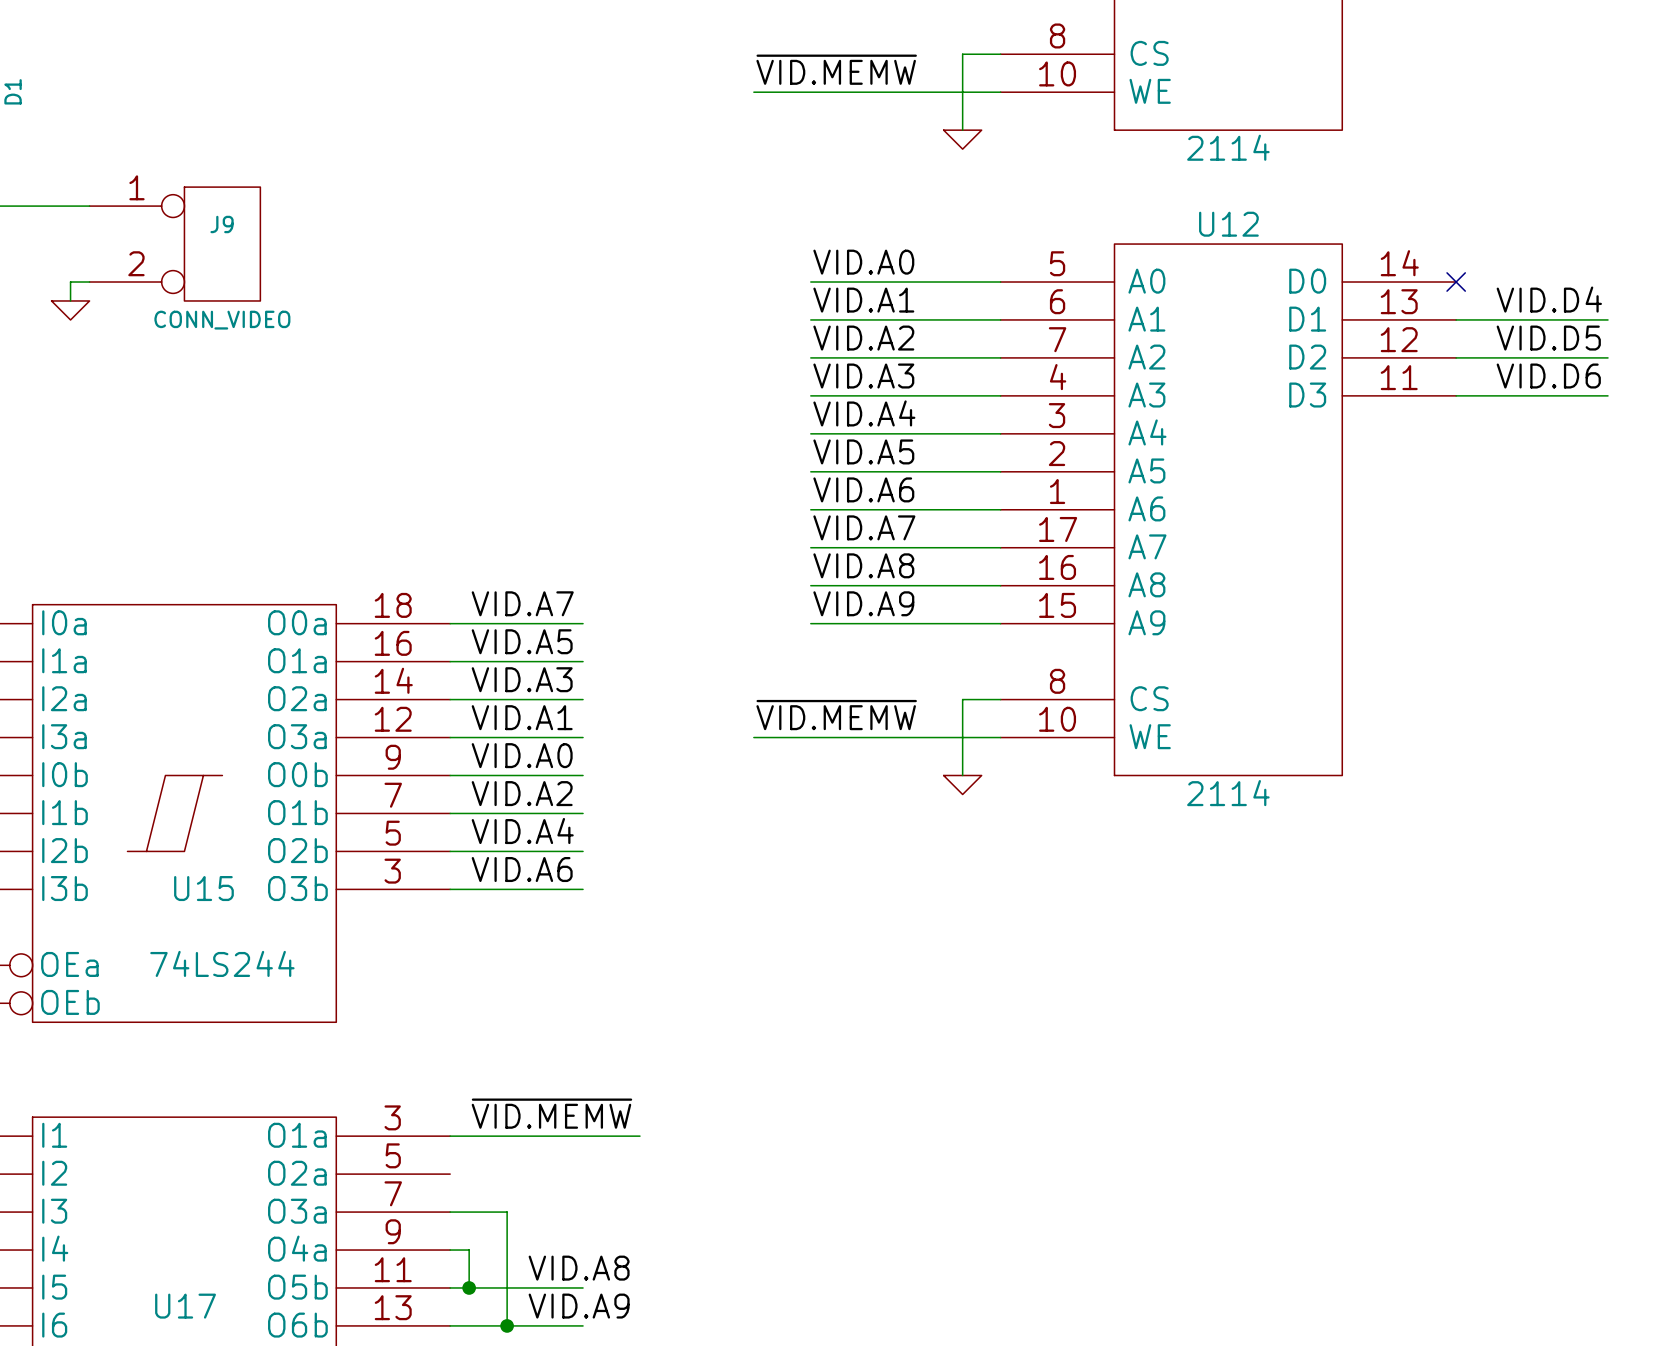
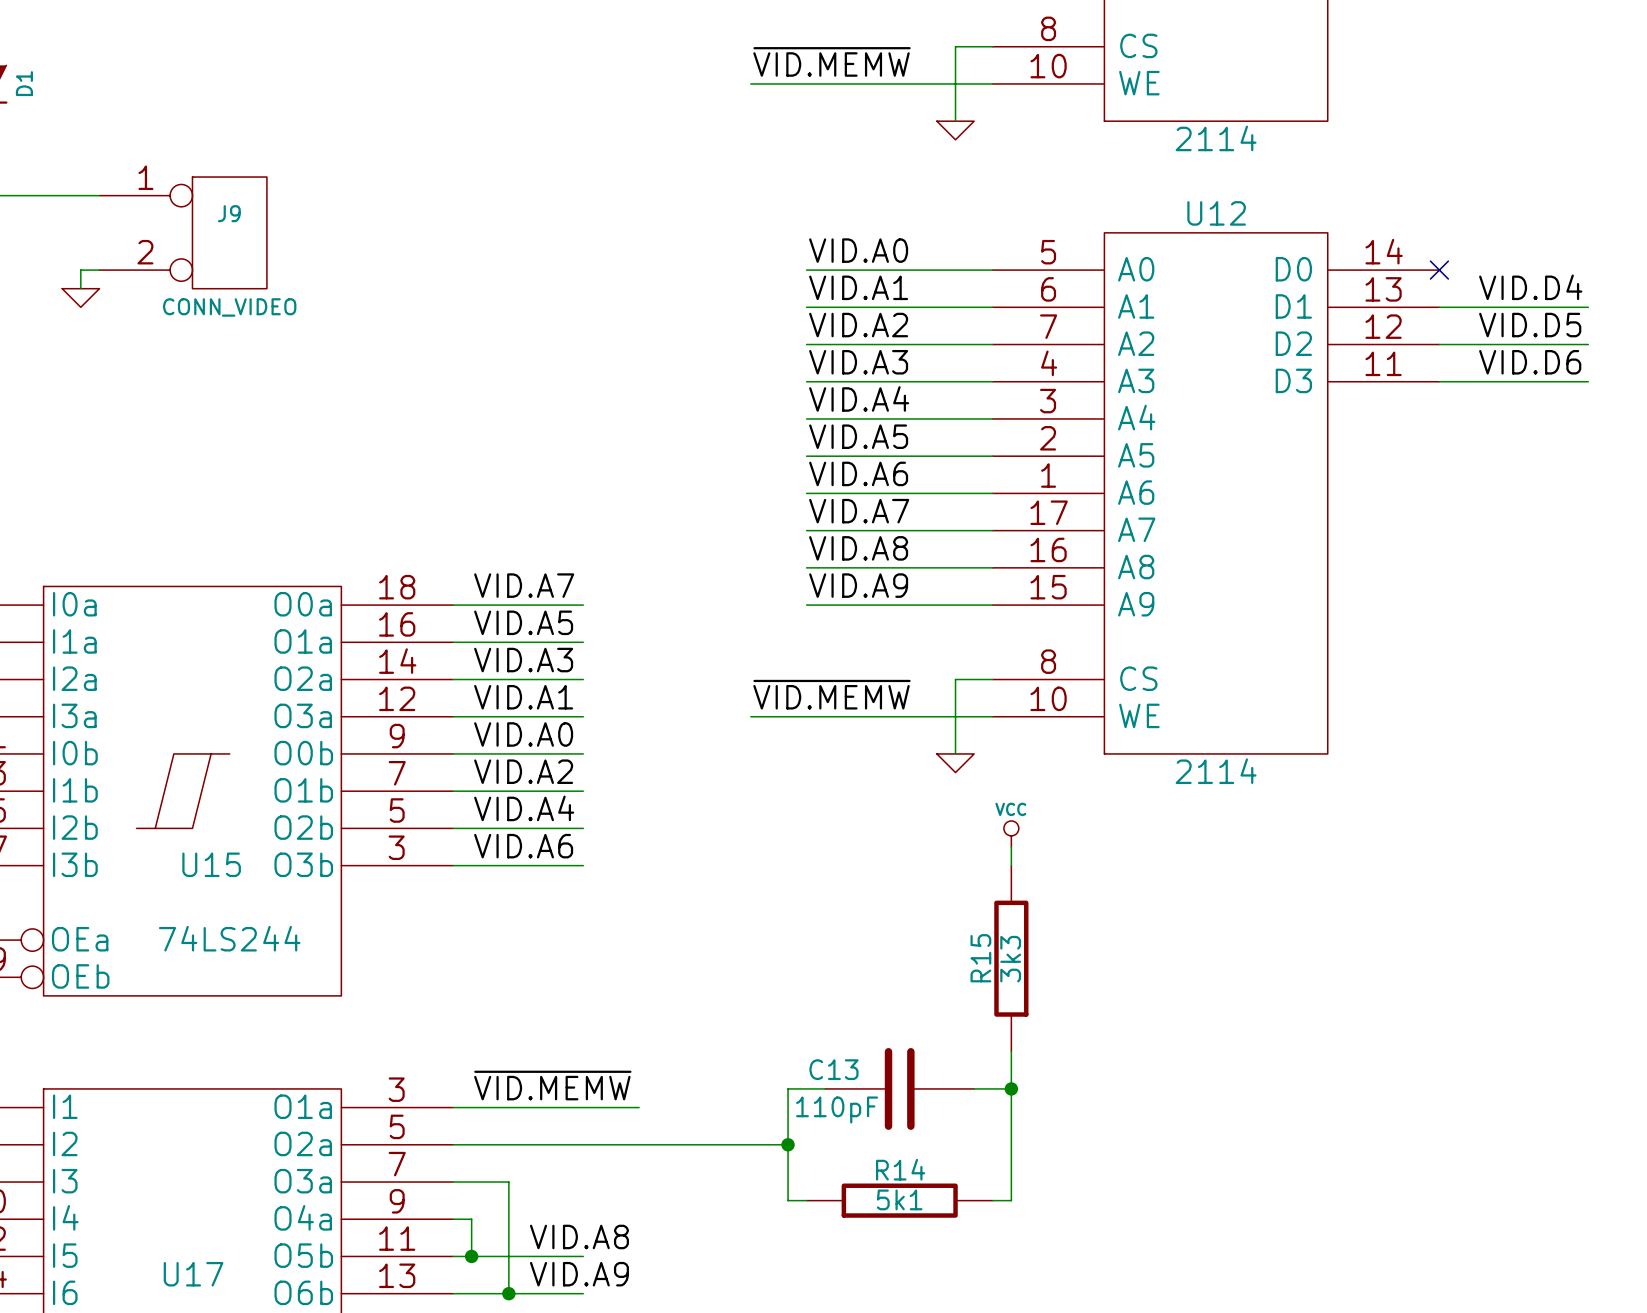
power symbol: none -> VCC (1011, 833)
wire: none -> (1011, 847) (1011, 865)
R15: none -> 3k3 (1011, 958)
wire: none -> (1011, 1051) (1011, 1200) (992, 1200)
wire: none -> (825, 1088) (788, 1088) (788, 1200) (806, 1200)
C13: none -> 110pF (899, 1088)
wire: none -> (974, 1088) (1011, 1088)
junction: none -> (1011, 1088)
wire: none -> (453, 1144) (788, 1144)
junction: none -> (788, 1144)
R14: none -> 5k1 (899, 1200)

